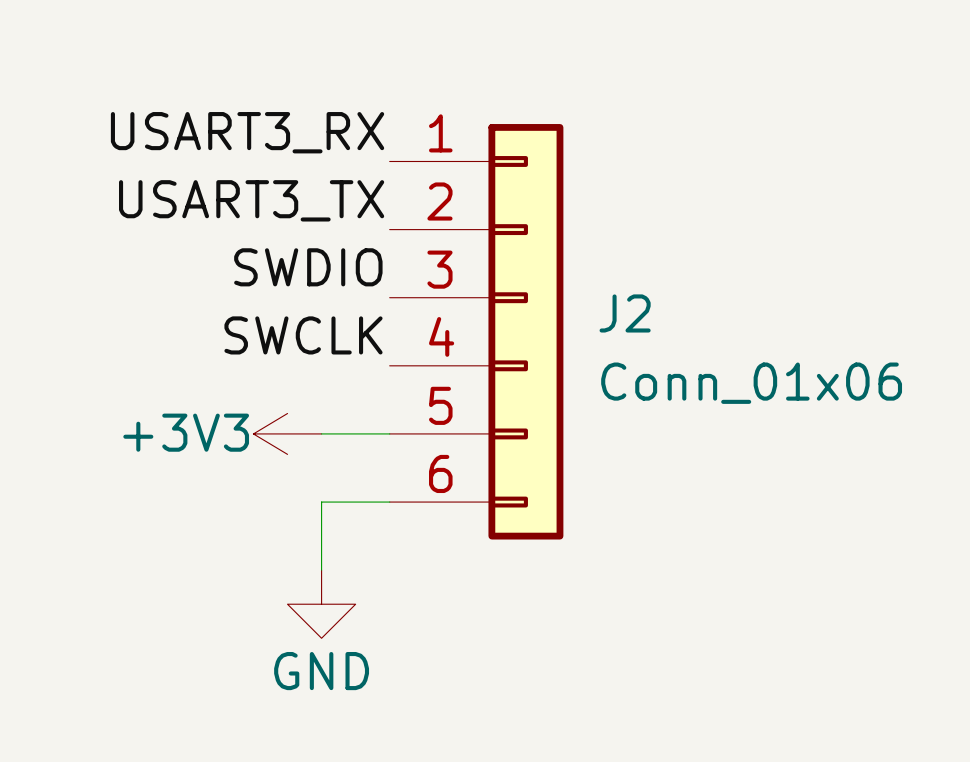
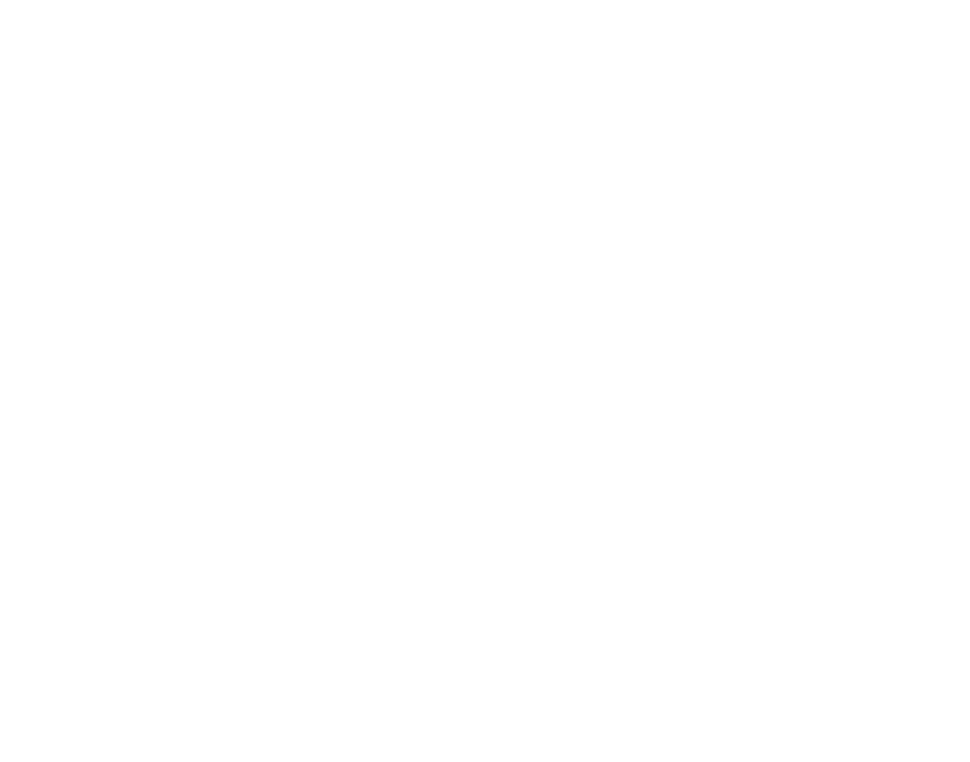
label: USART3_RX (247, 132) -> none
label: USART3_TX (251, 200) -> none
label: SWDIO (308, 267) -> none
J2: Conn_01x06 (476, 331) -> none
label: SWCLK (303, 335) -> none
power symbol: +3V3 (287, 433) -> none
wire: (321, 433) (389, 433) -> none
wire: (389, 502) (321, 502) (321, 570) -> none
power symbol: GND (321, 604) -> none

